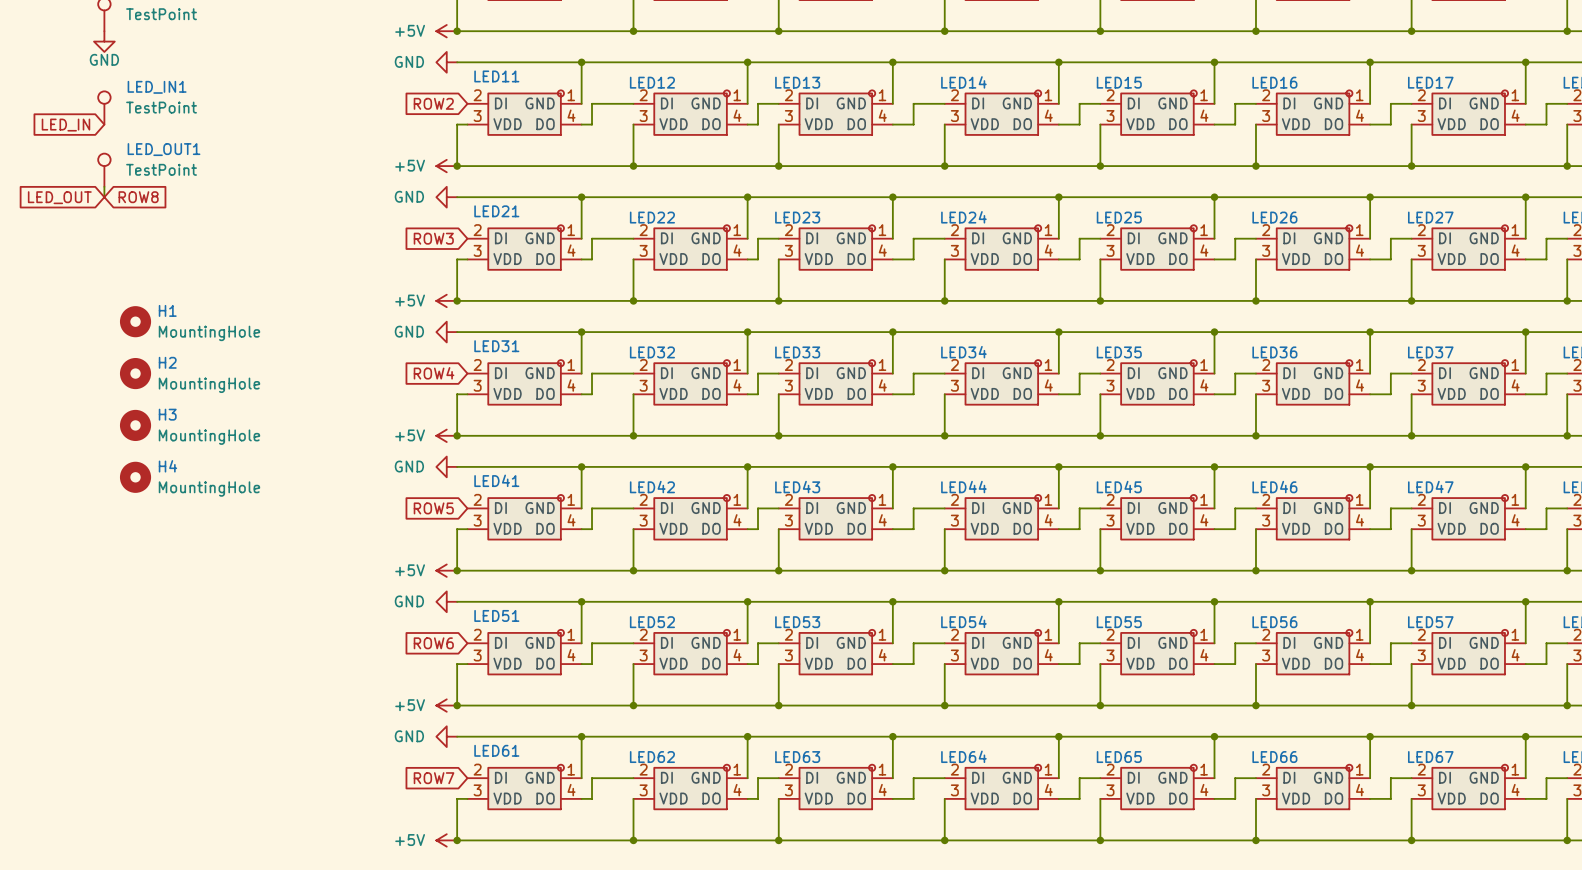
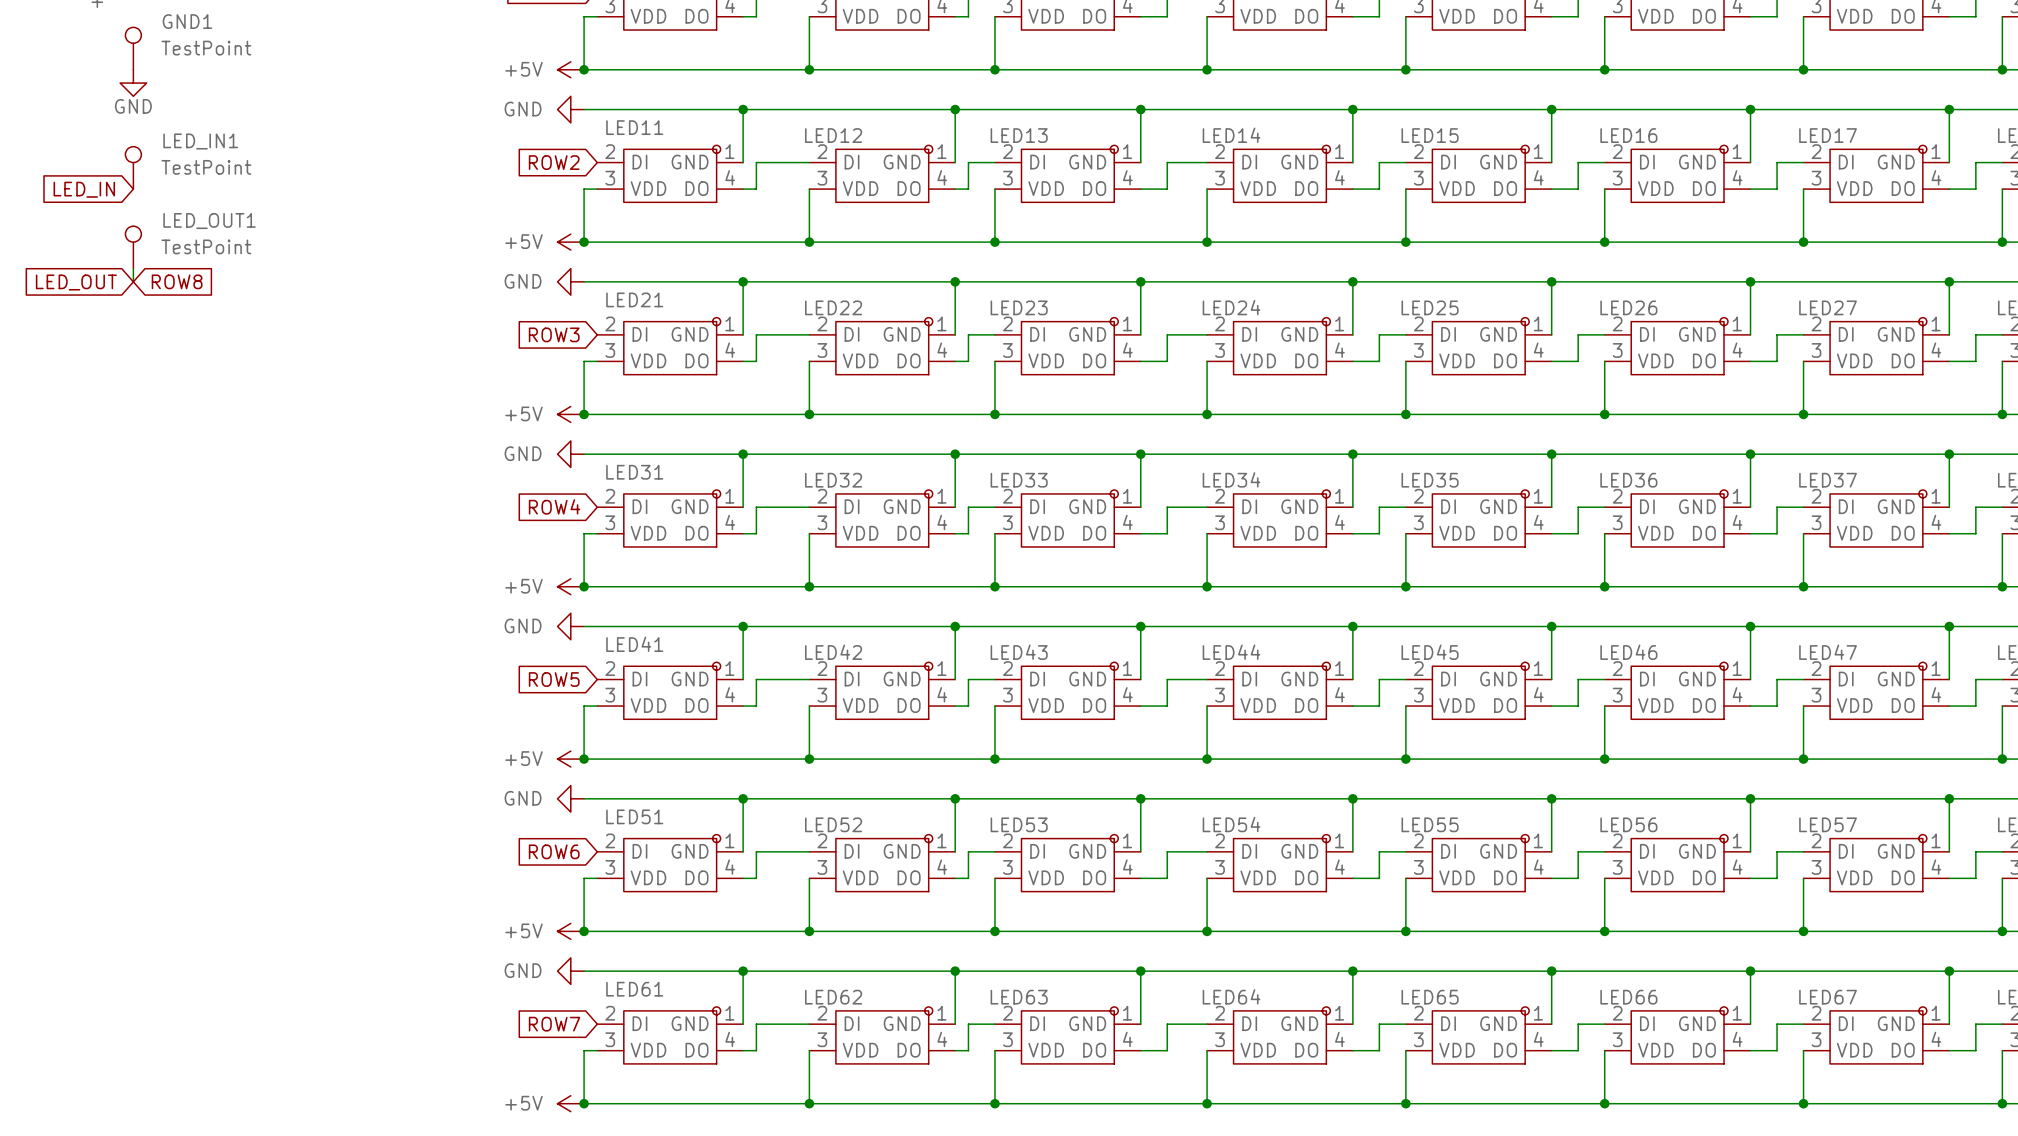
H1: MountingHole (135, 321) -> none
H2: MountingHole (135, 373) -> none
H3: MountingHole (135, 425) -> none
H4: MountingHole (135, 477) -> none

